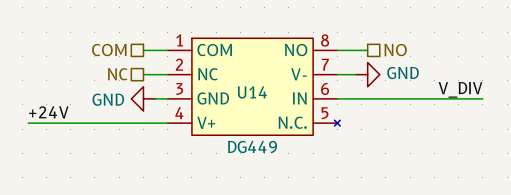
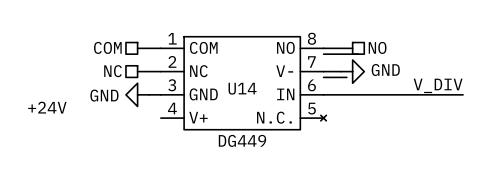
wire: none -> (323, 54) (358, 54)
wire: none -> (323, 77) (346, 77)
wire: (28, 123) (167, 123) -> none

